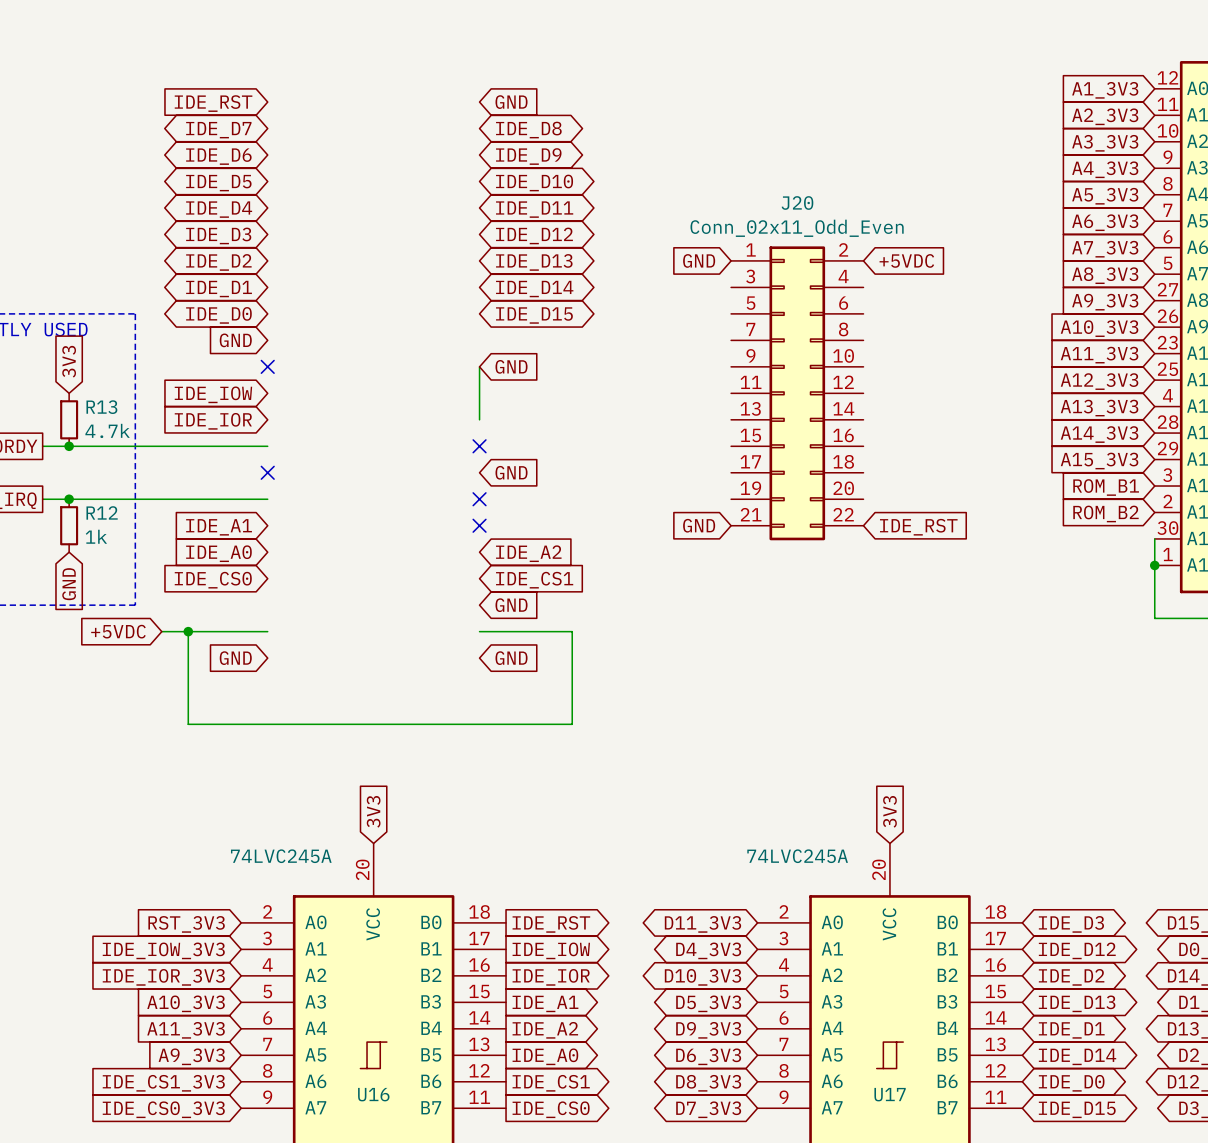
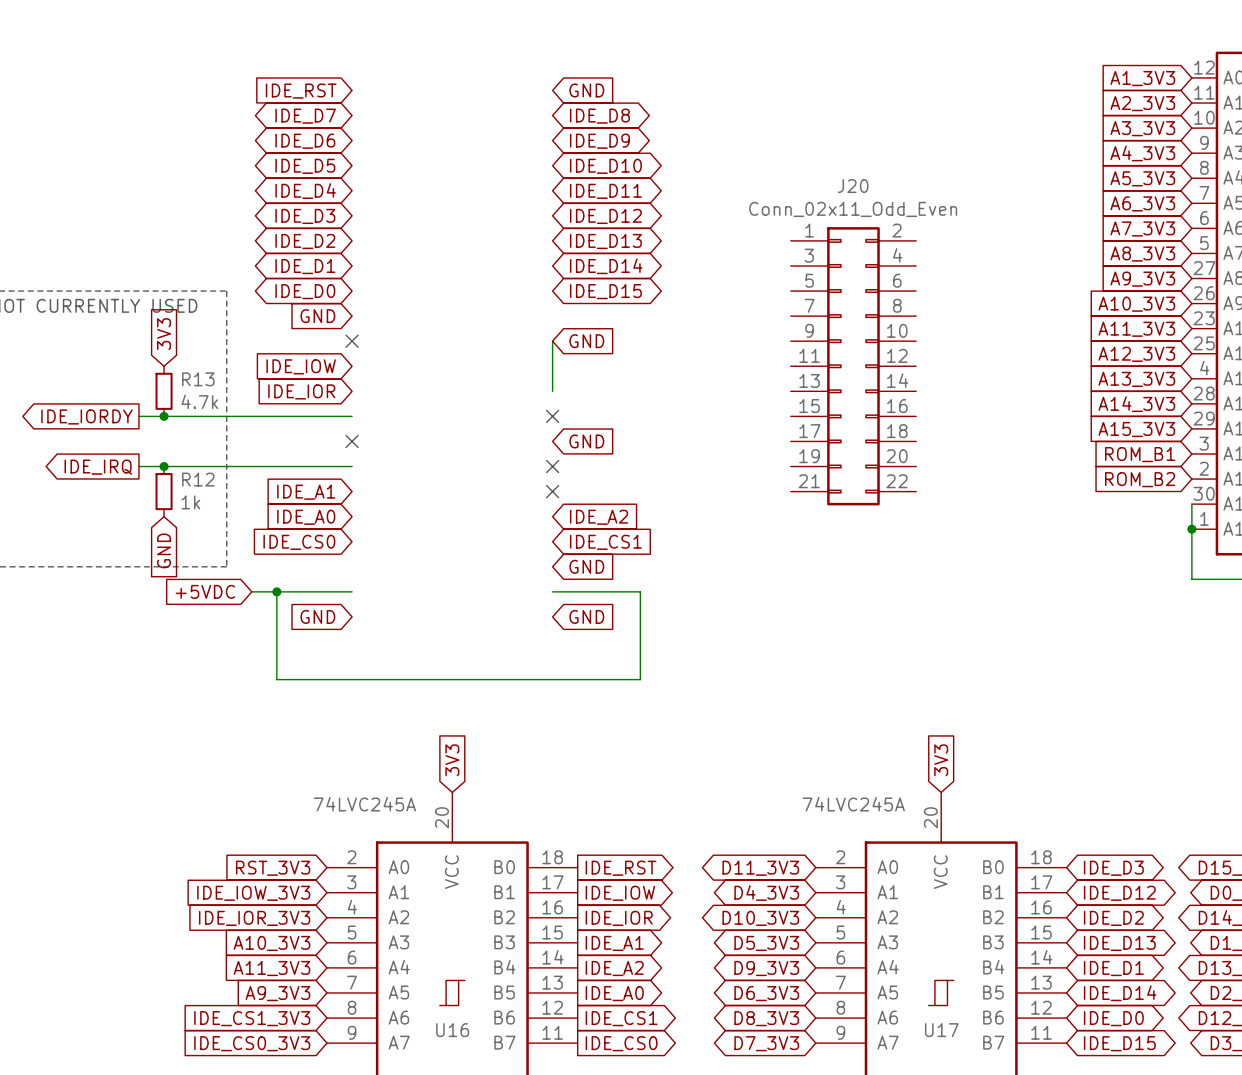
global label: GND (699, 260) -> none
global label: +5VDC (906, 260) -> none
global label: GND (699, 525) -> none
global label: IDE_RST (918, 527) -> none

